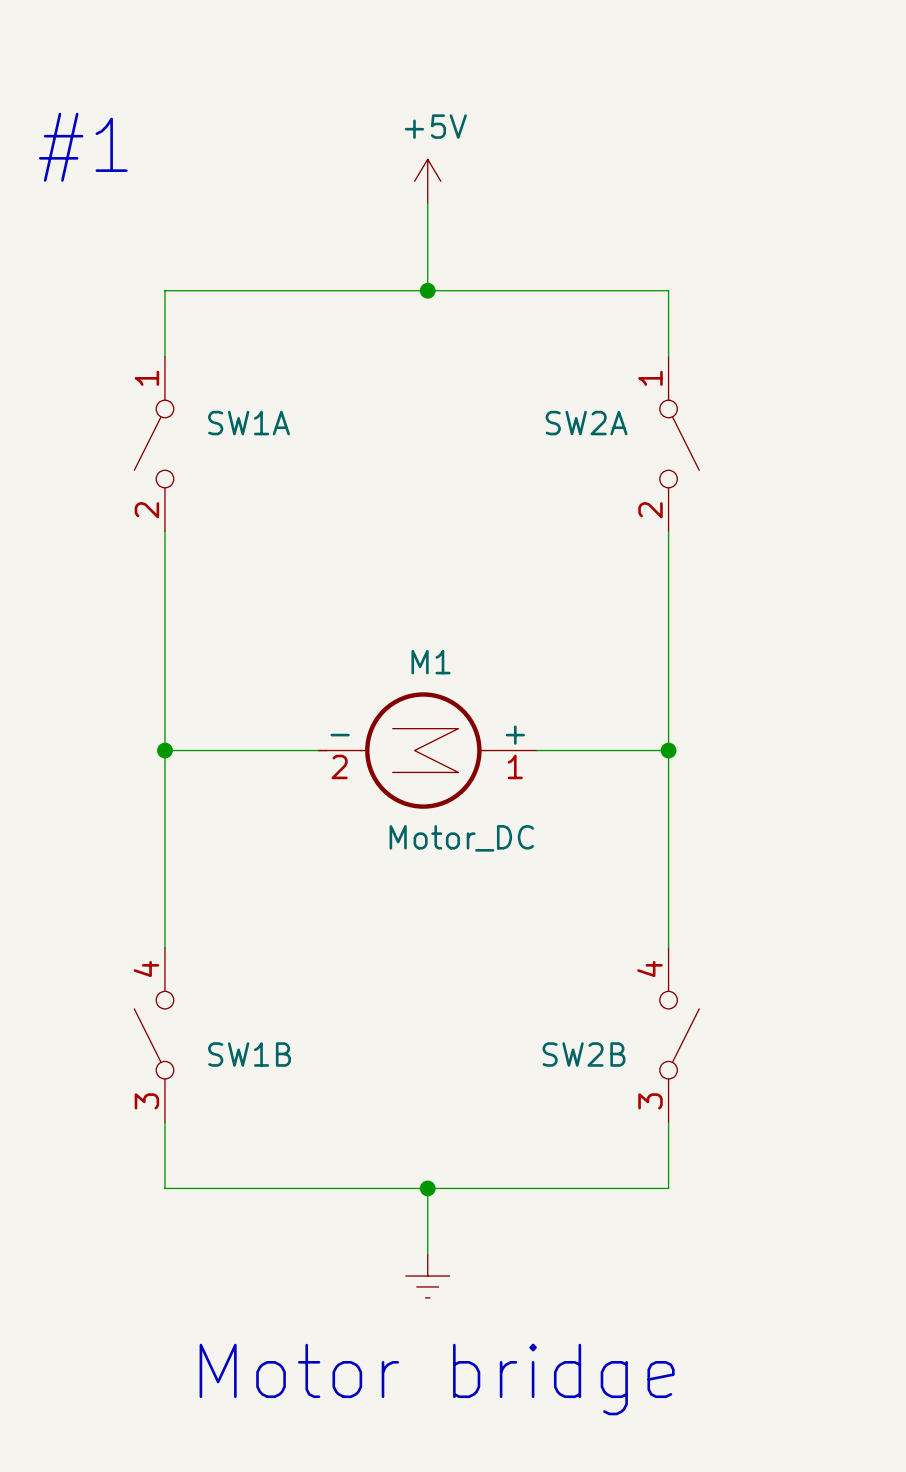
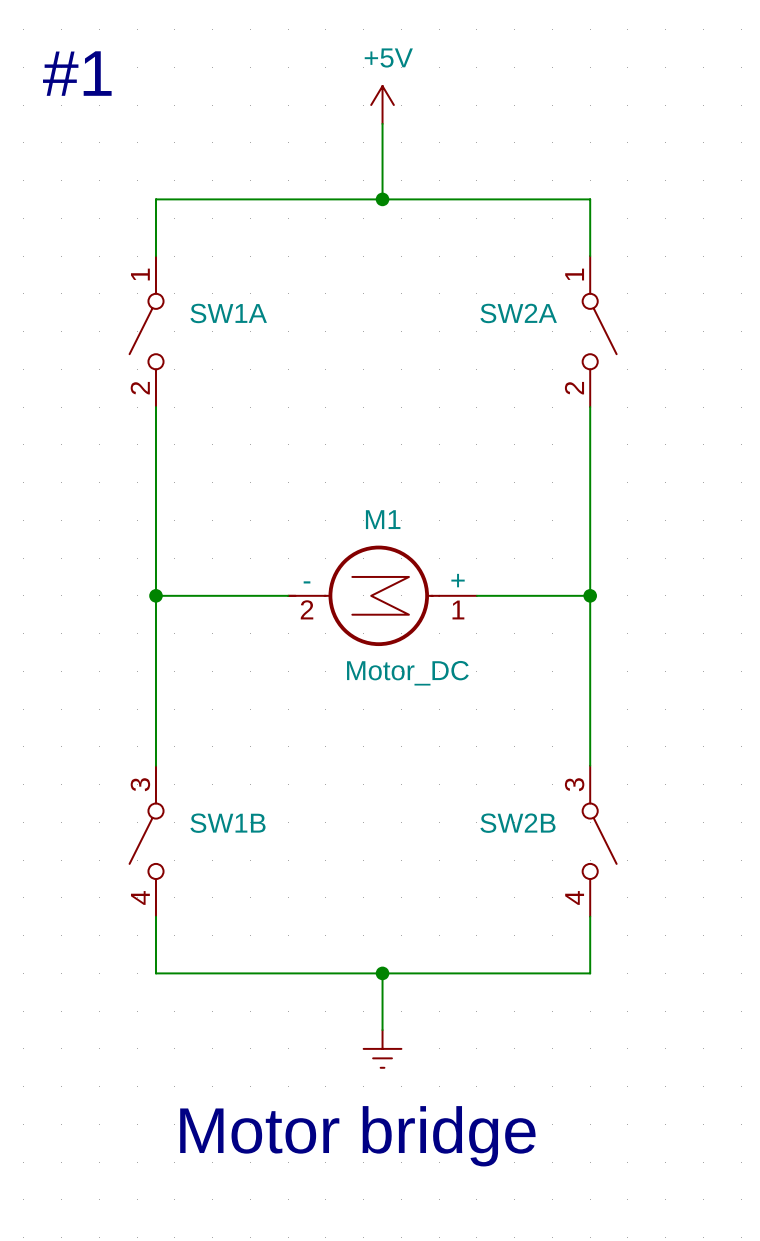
SW1B flip: as is (154, 1035) -> up-down (146, 841)
SW2B flip: as is (679, 1035) -> up-down (599, 841)

